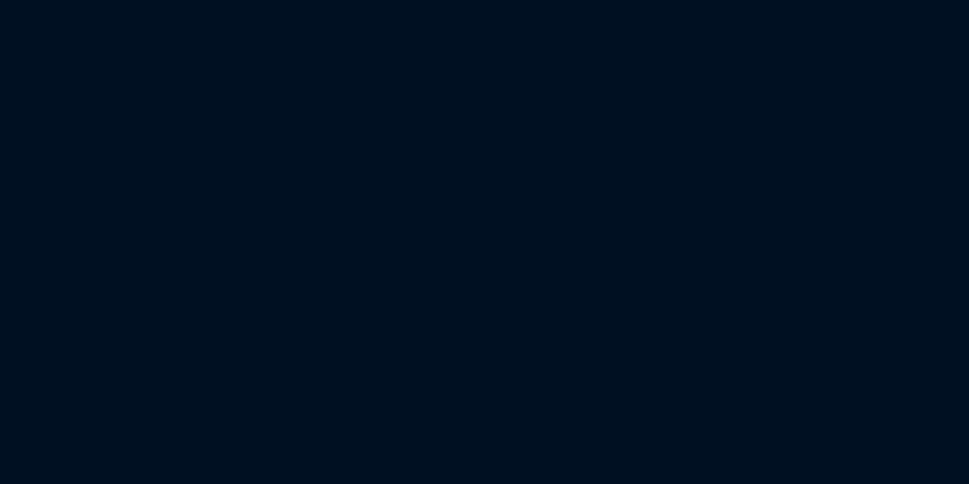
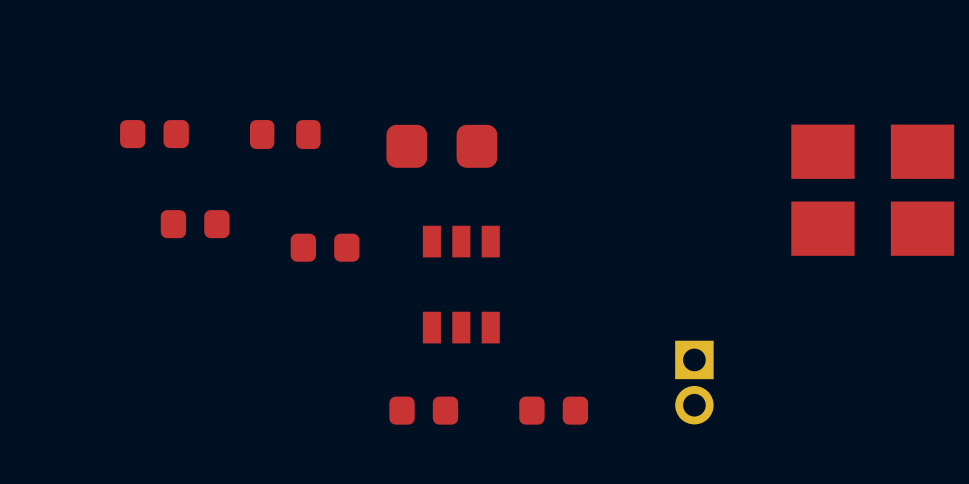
part: none -> (154, 134)
part: none -> (285, 134)
part: none -> (441, 146)
part: none -> (872, 190)
part: none -> (195, 224)
part: none -> (325, 247)
part: none -> (461, 284)
part: none -> (694, 382)
part: none -> (423, 410)
part: none -> (553, 410)

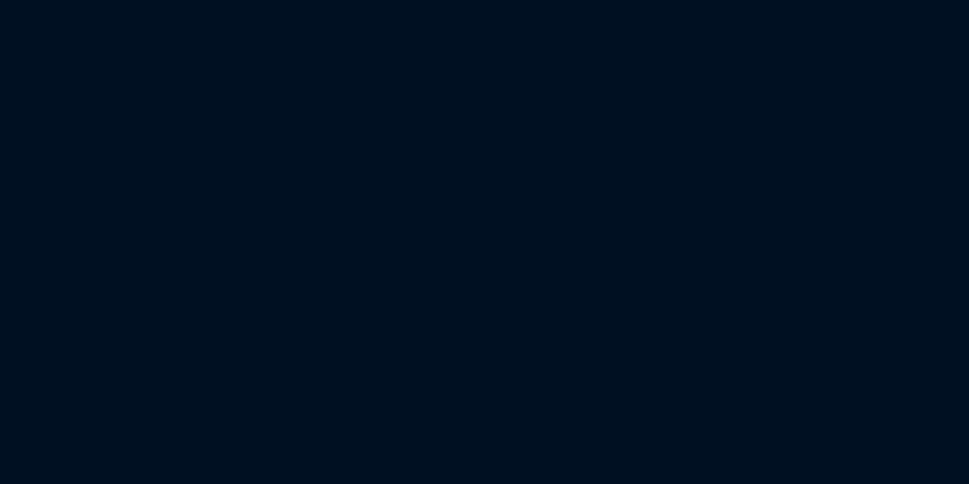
part: (154, 134) -> none
part: (285, 134) -> none
part: (441, 146) -> none
part: (872, 190) -> none
part: (195, 224) -> none
part: (325, 247) -> none
part: (461, 284) -> none
part: (694, 382) -> none
part: (423, 410) -> none
part: (553, 410) -> none

